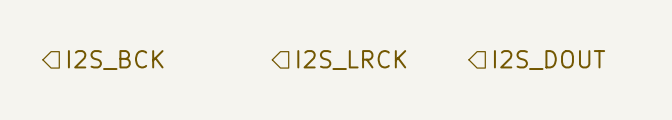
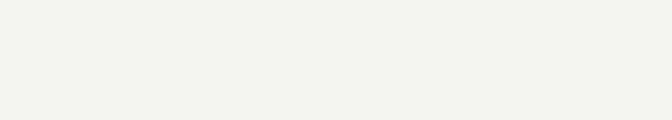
hierarchical label: I2S_BCK (115, 60) -> none
hierarchical label: I2S_LRCK (351, 60) -> none
hierarchical label: I2S_DOUT (549, 60) -> none

